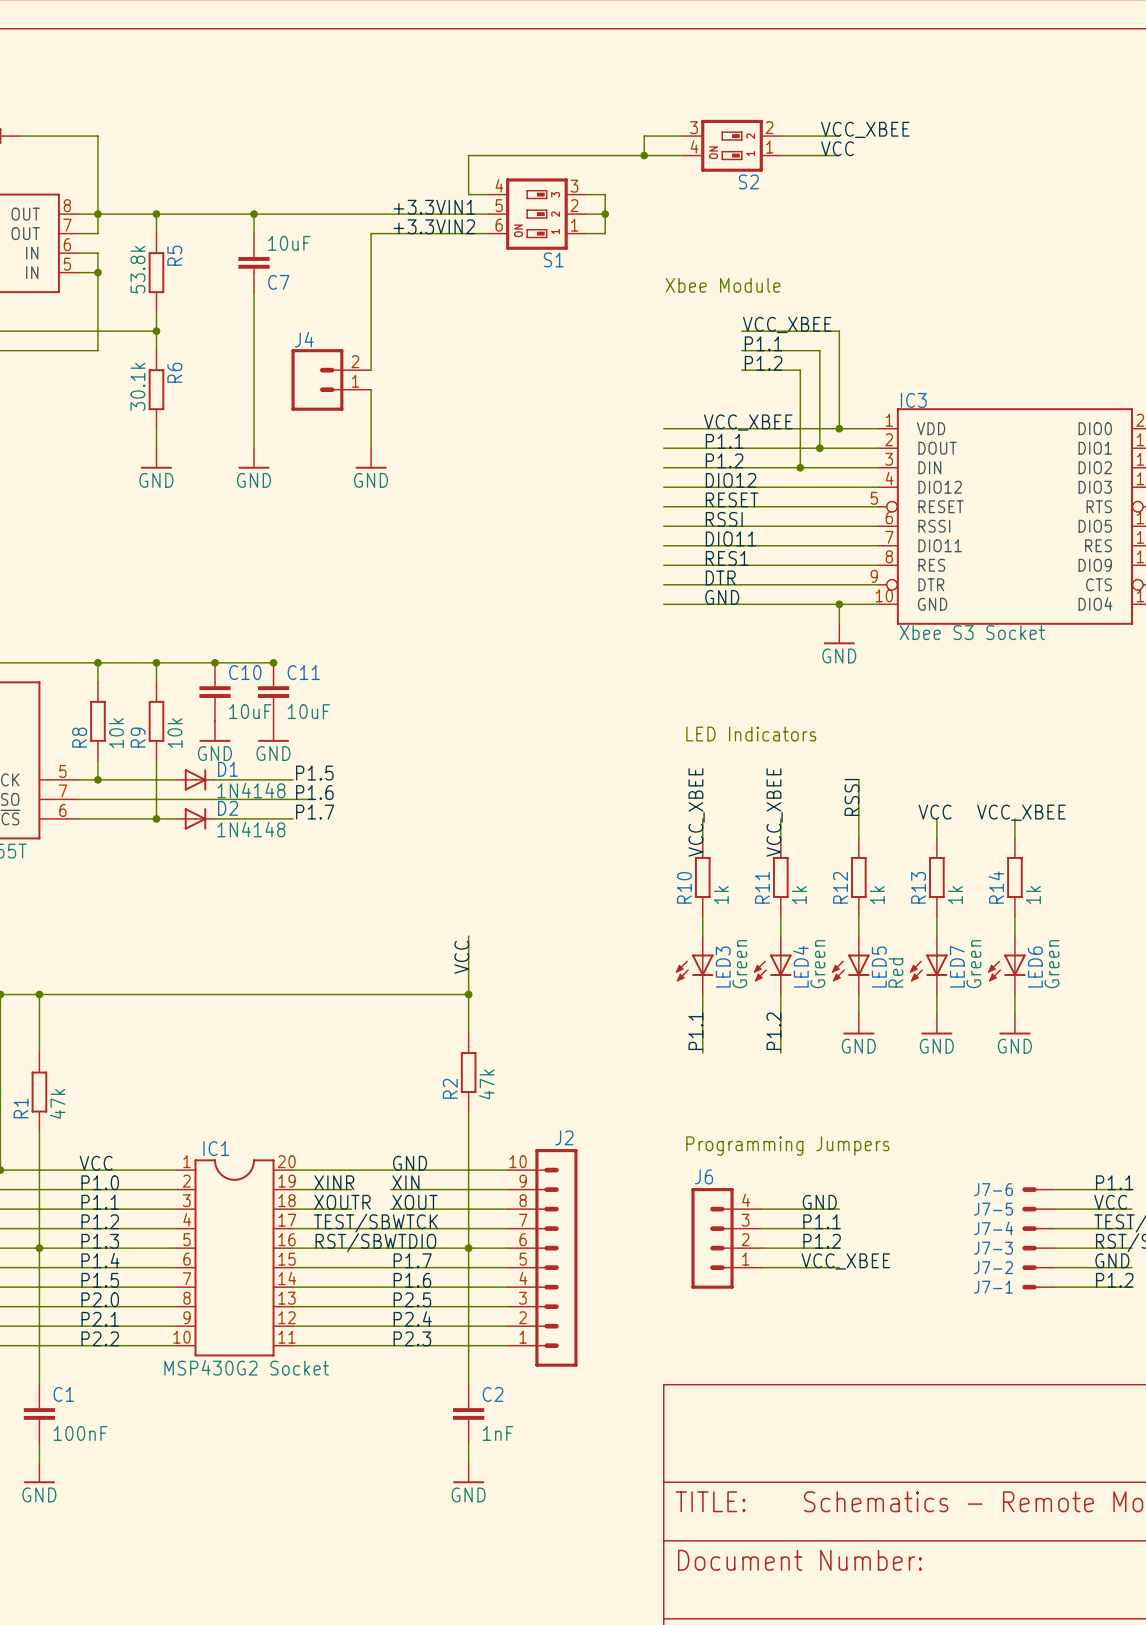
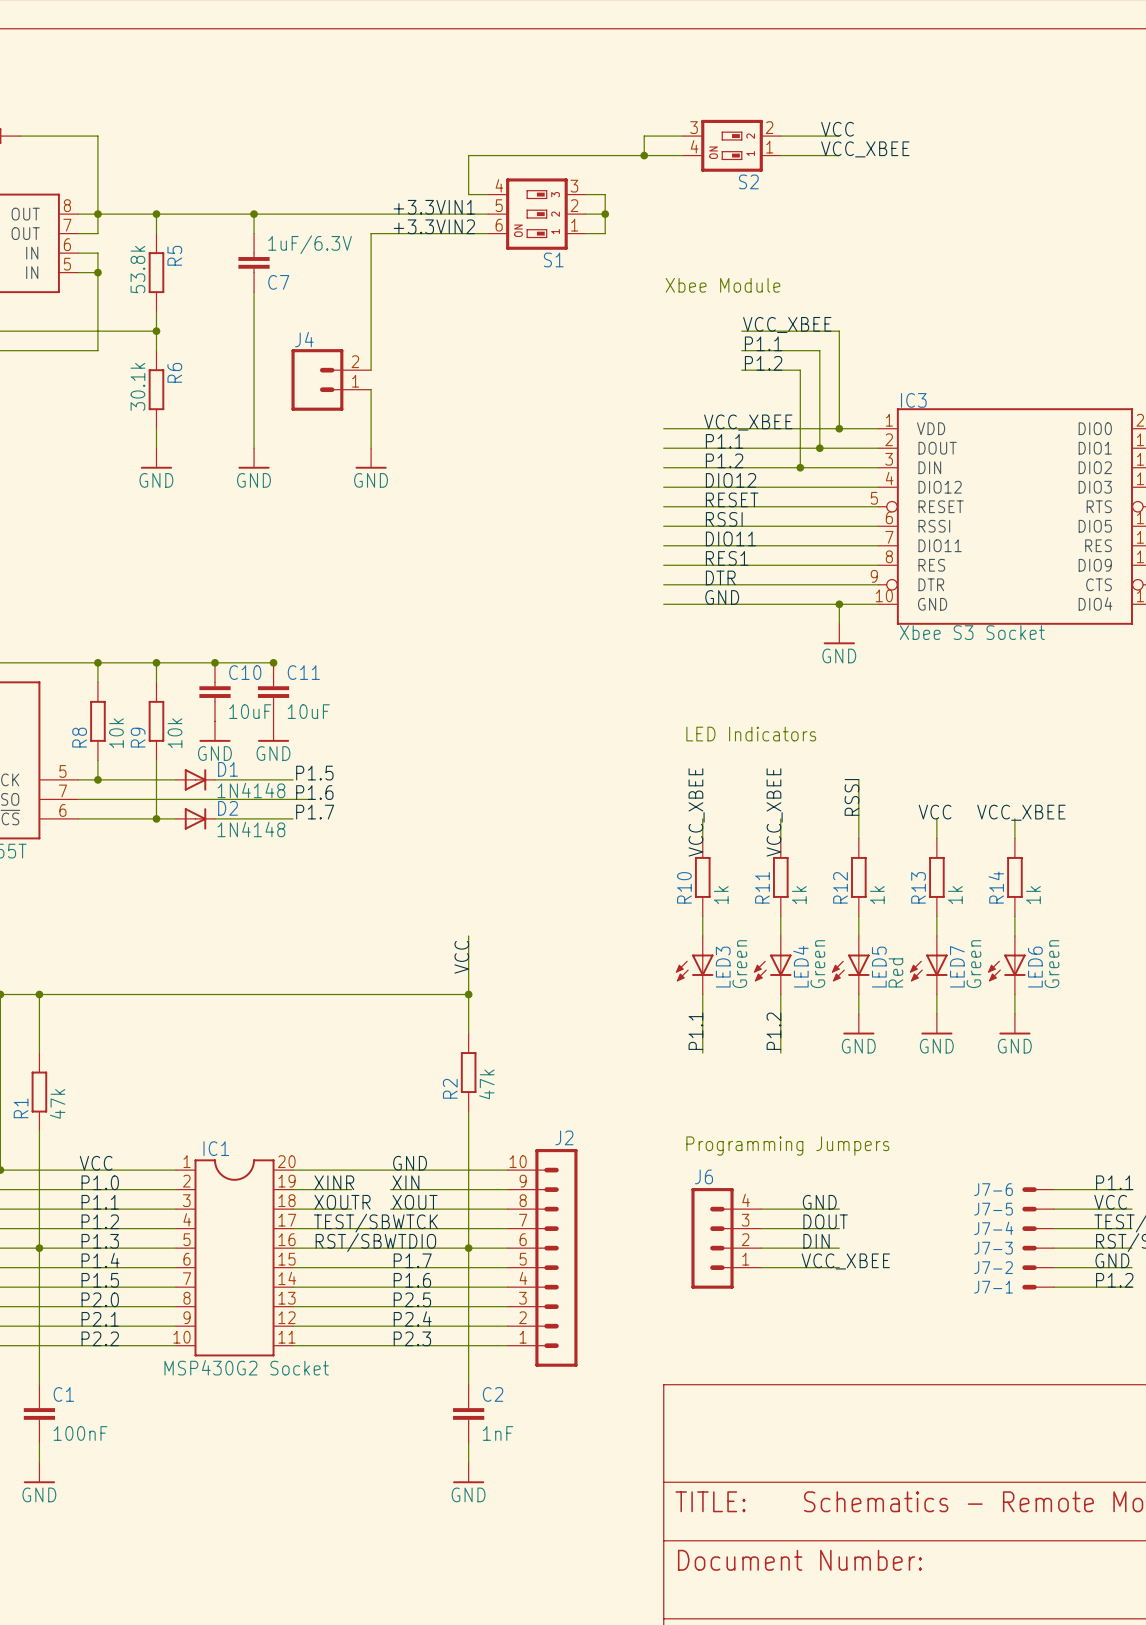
label: VCC_XBEE (865, 129) -> VCC (837, 129)
label: VCC (837, 148) -> VCC_XBEE (865, 149)
C7 value: 10uF (289, 243) -> 1uF/6.3V (310, 244)
label: P1.1 (822, 1221) -> DOUT (825, 1221)
label: P1.2 (822, 1241) -> DIN (816, 1241)

